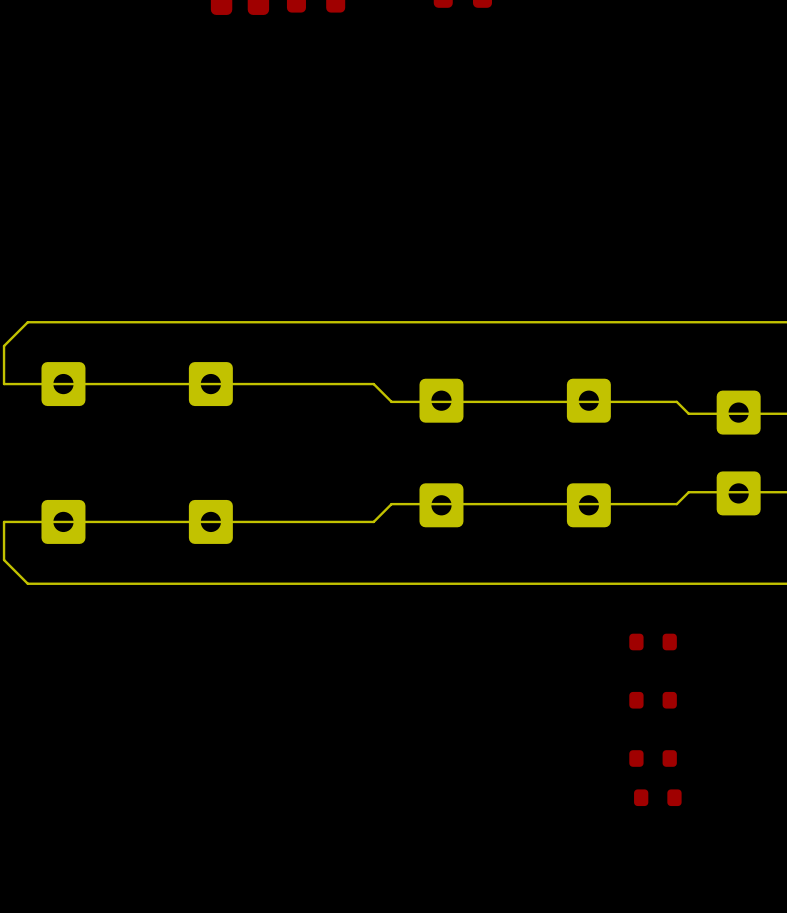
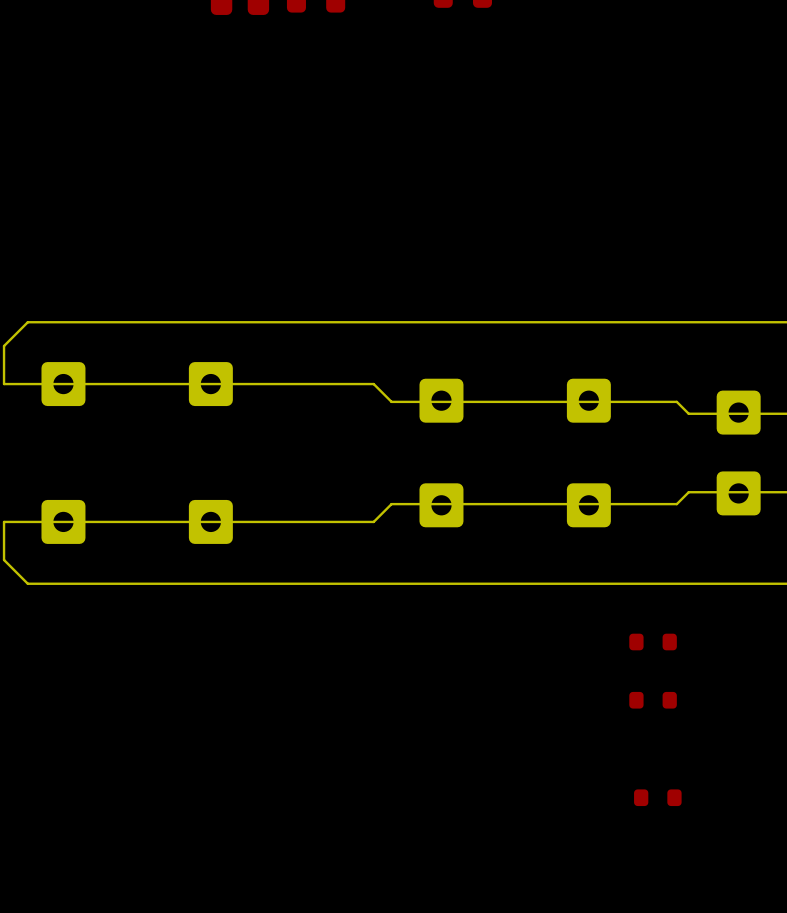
part: (653, 758) -> none

